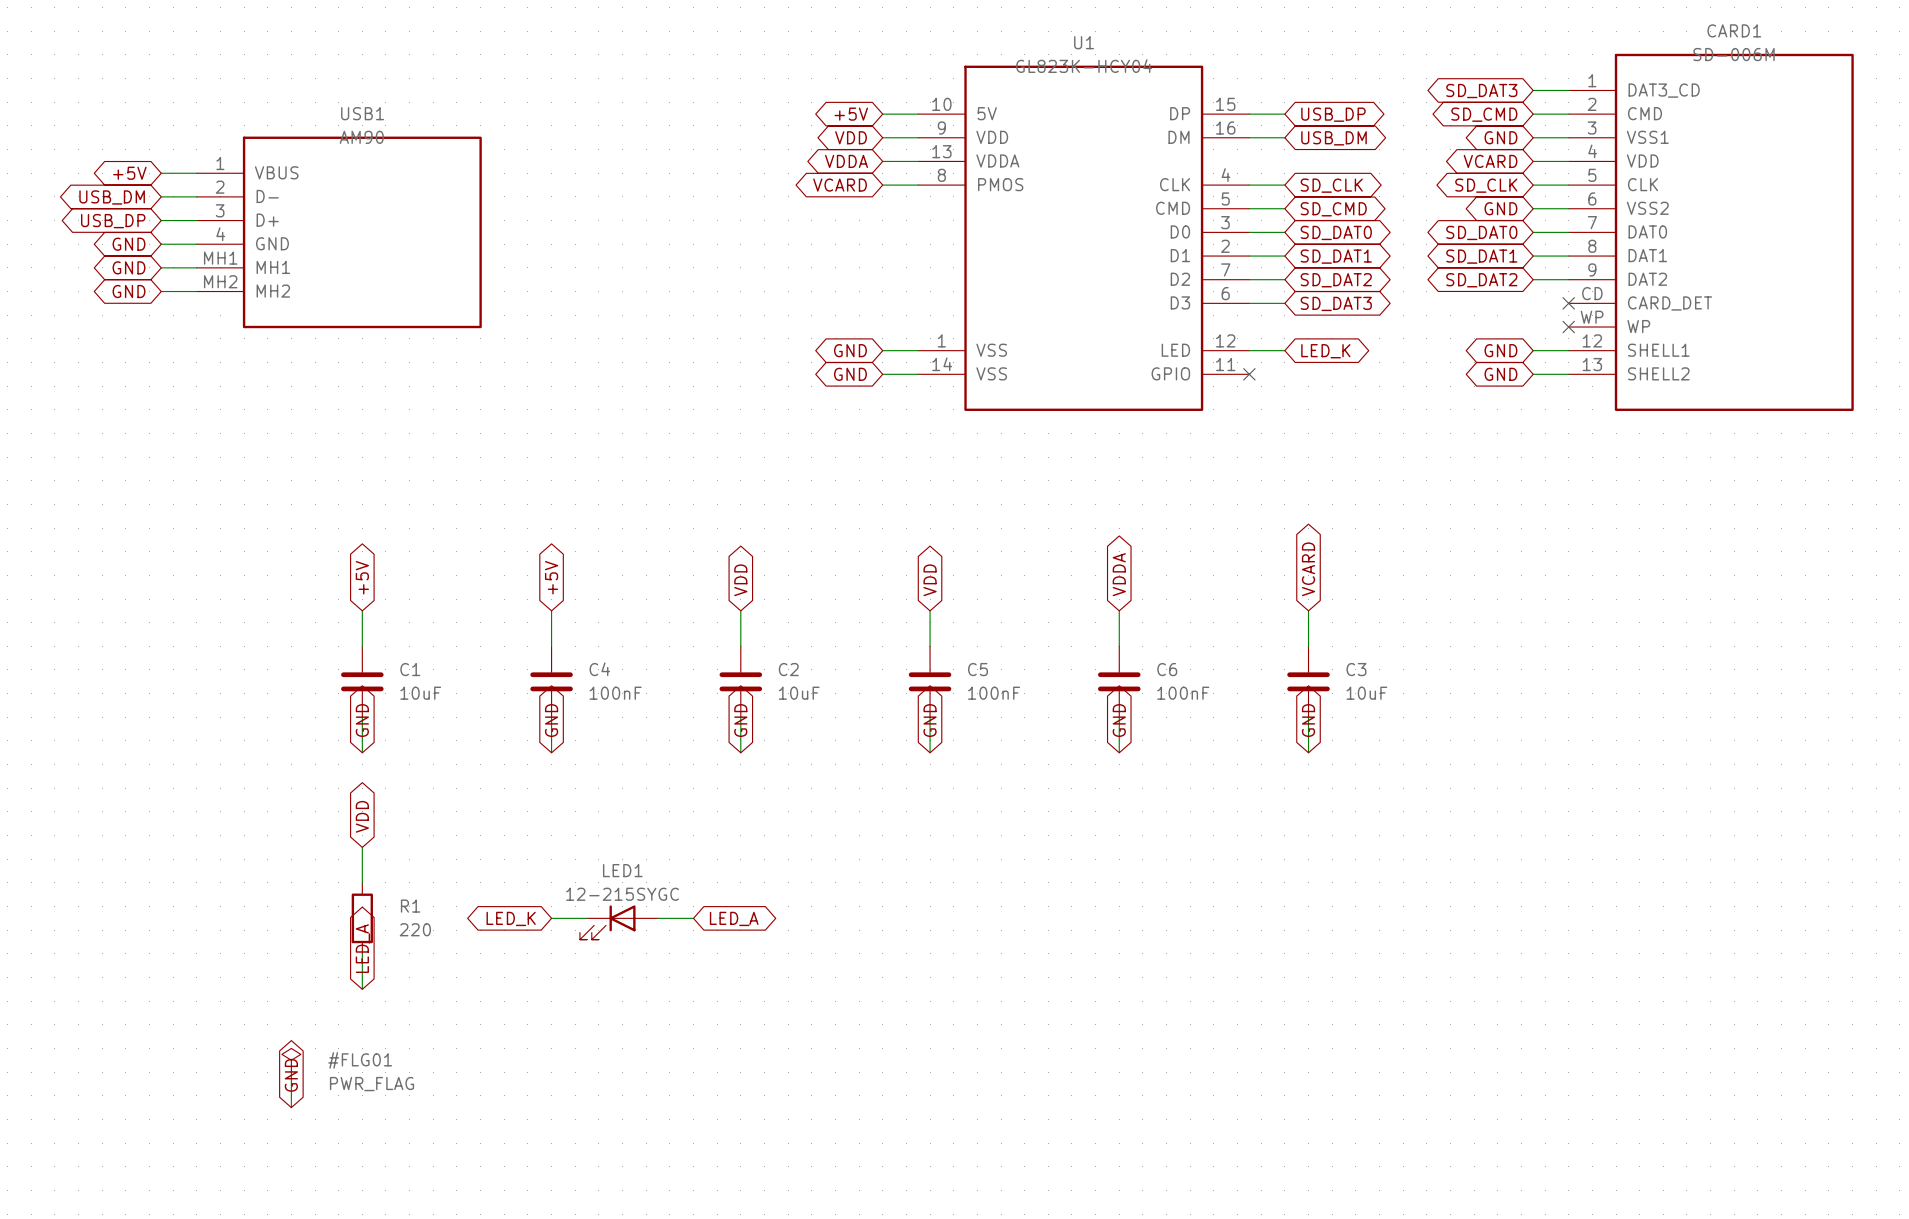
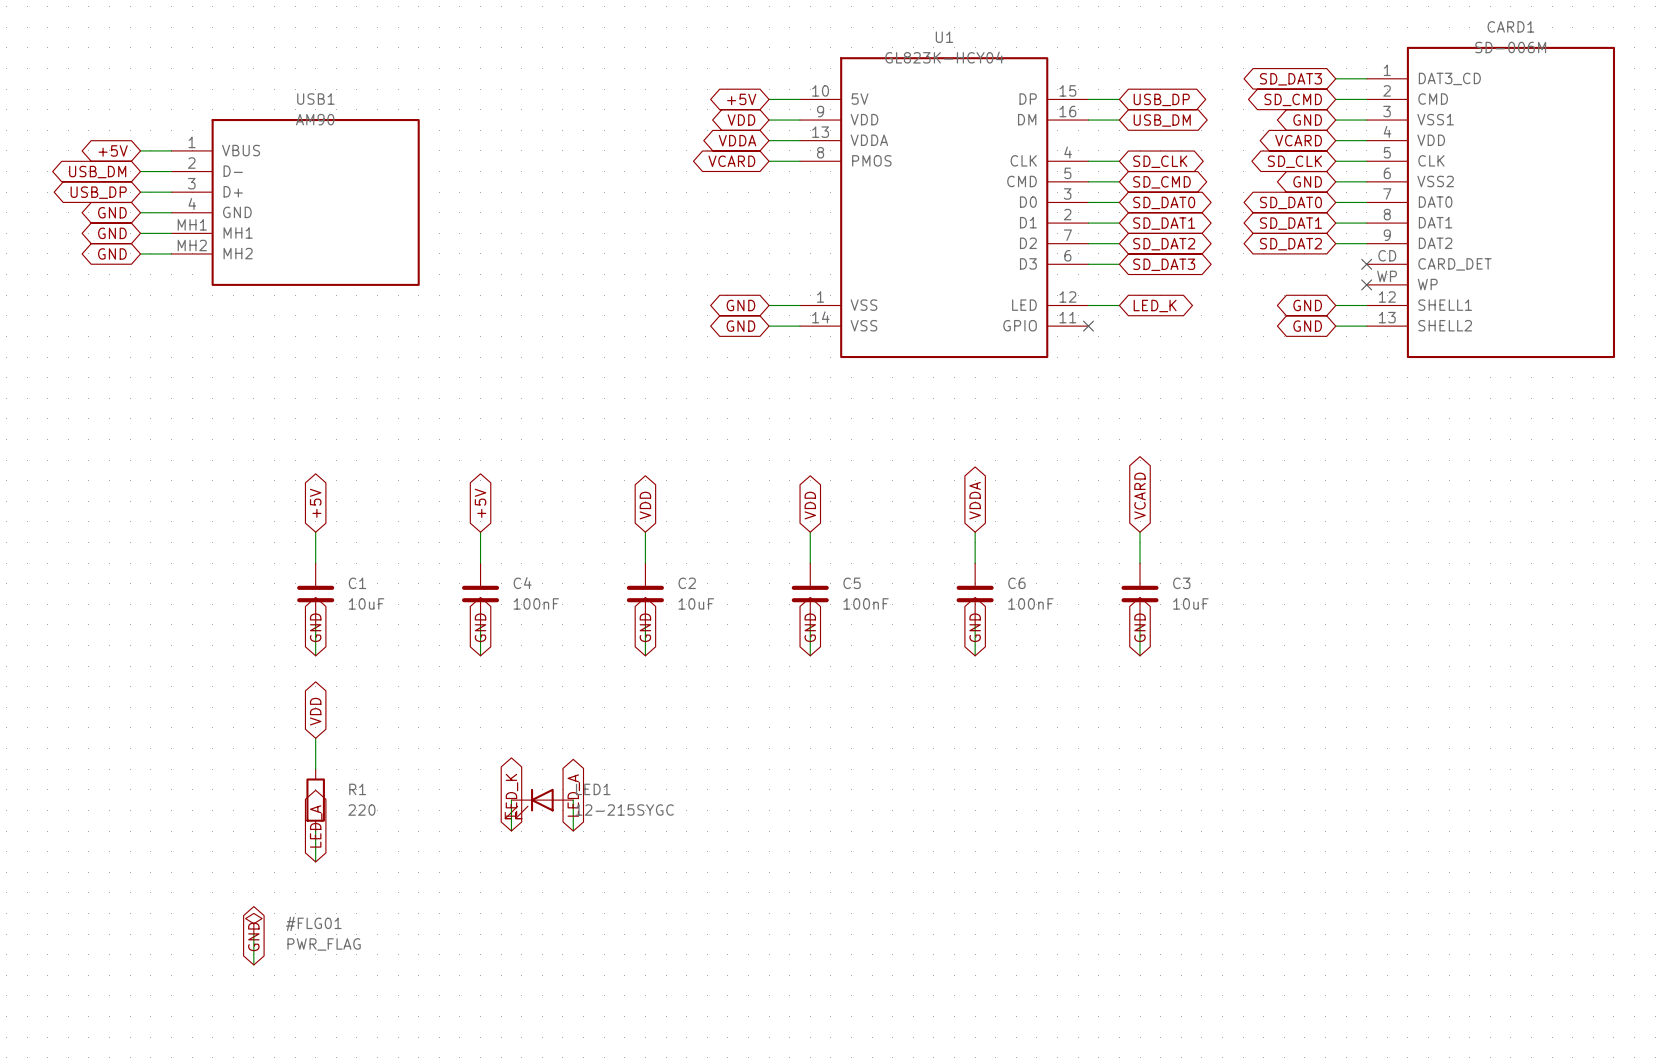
LED1 name position: LED1 (622, 870) -> LED1 (593, 789)
LED1 value position: 12-215SYGC (622, 894) -> 12-215SYGC (624, 810)
global label rotation: 0° (511, 918) -> 90° clockwise (511, 795)
wire: (551, 918) (587, 918) -> (511, 831) (511, 800)
wire: (658, 918) (693, 918) -> (573, 800) (573, 831)
global label rotation: 0° (734, 918) -> 90° counterclockwise (573, 795)

